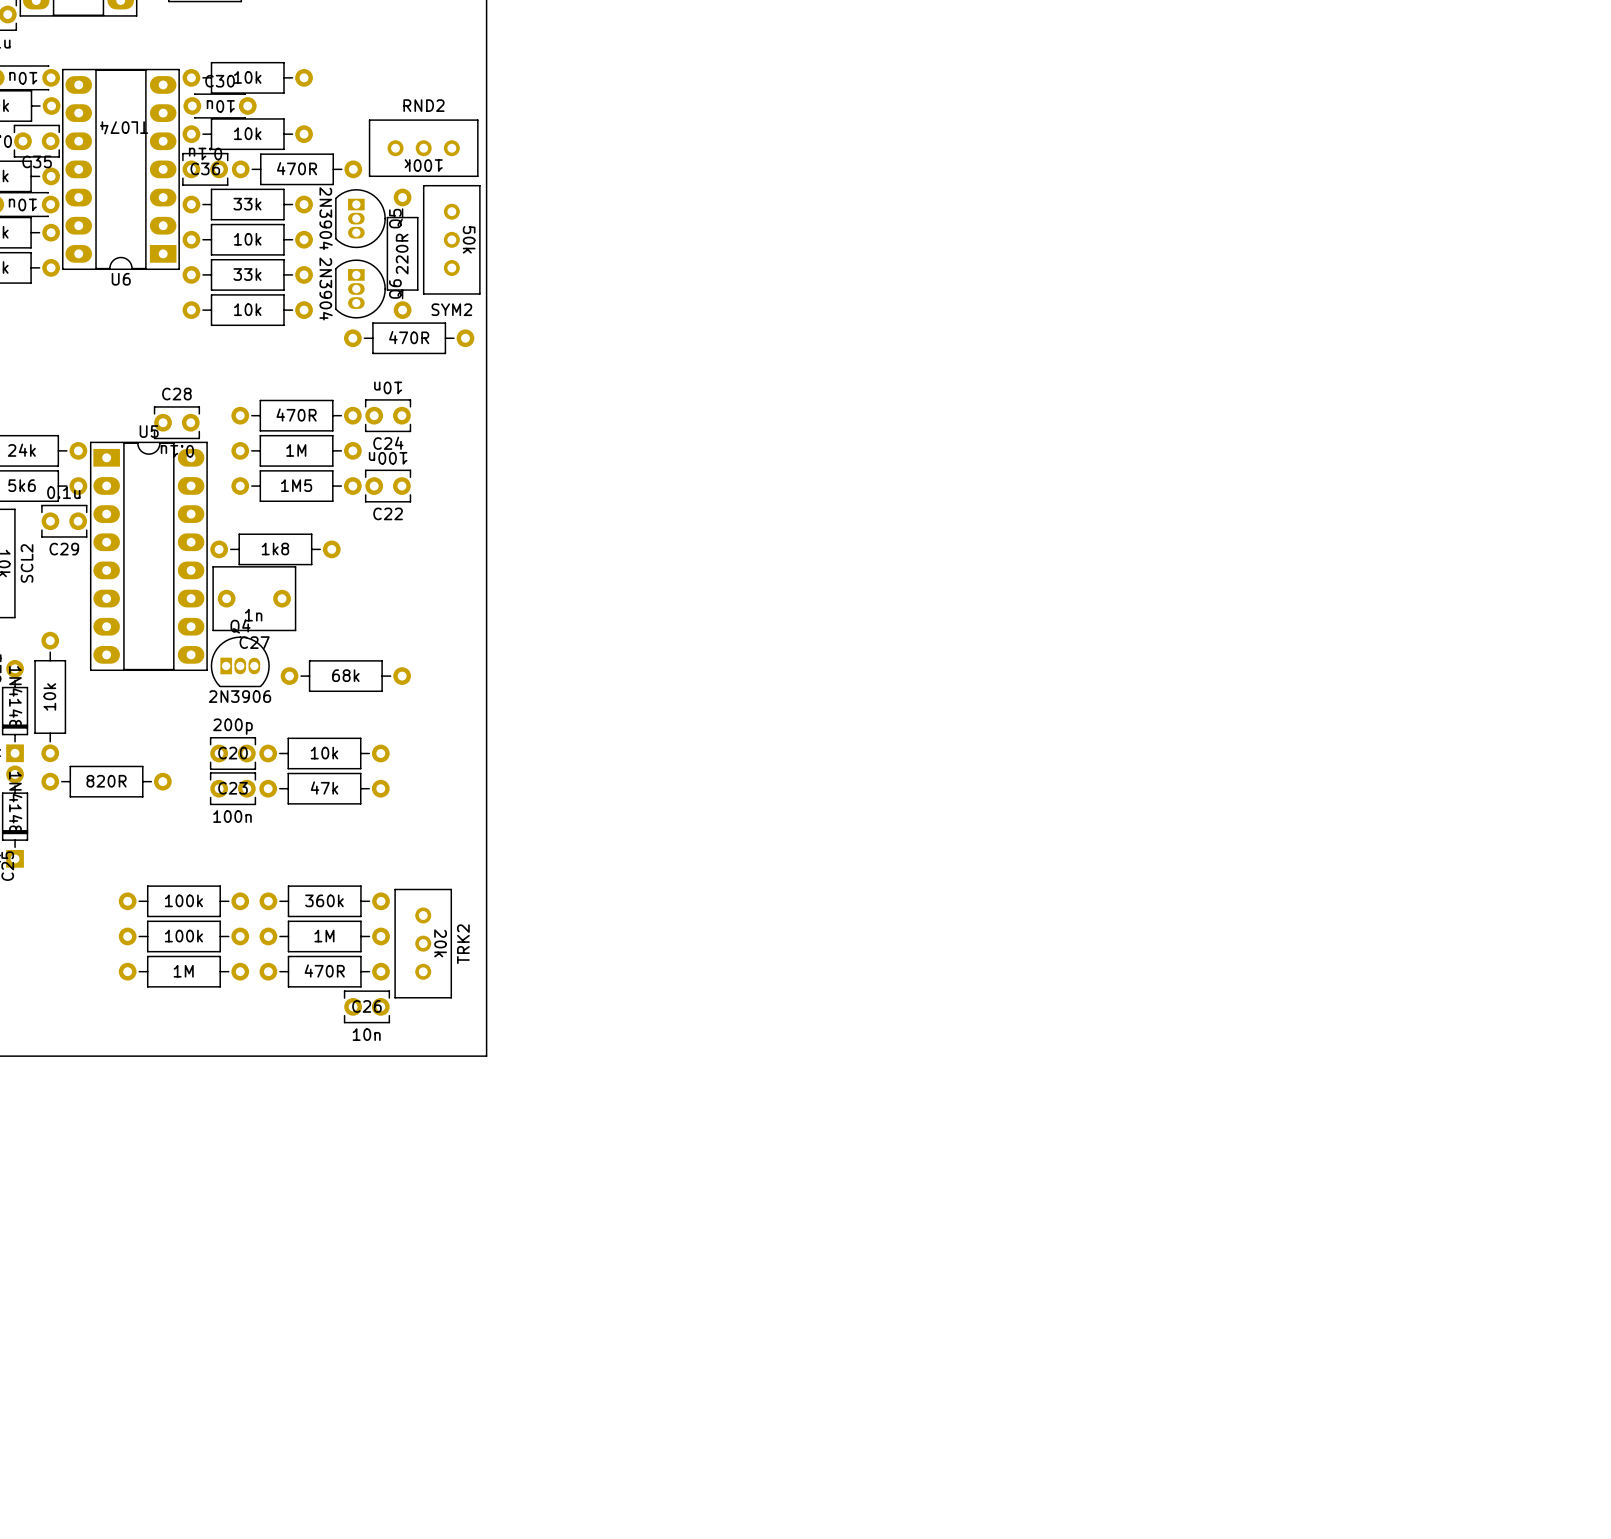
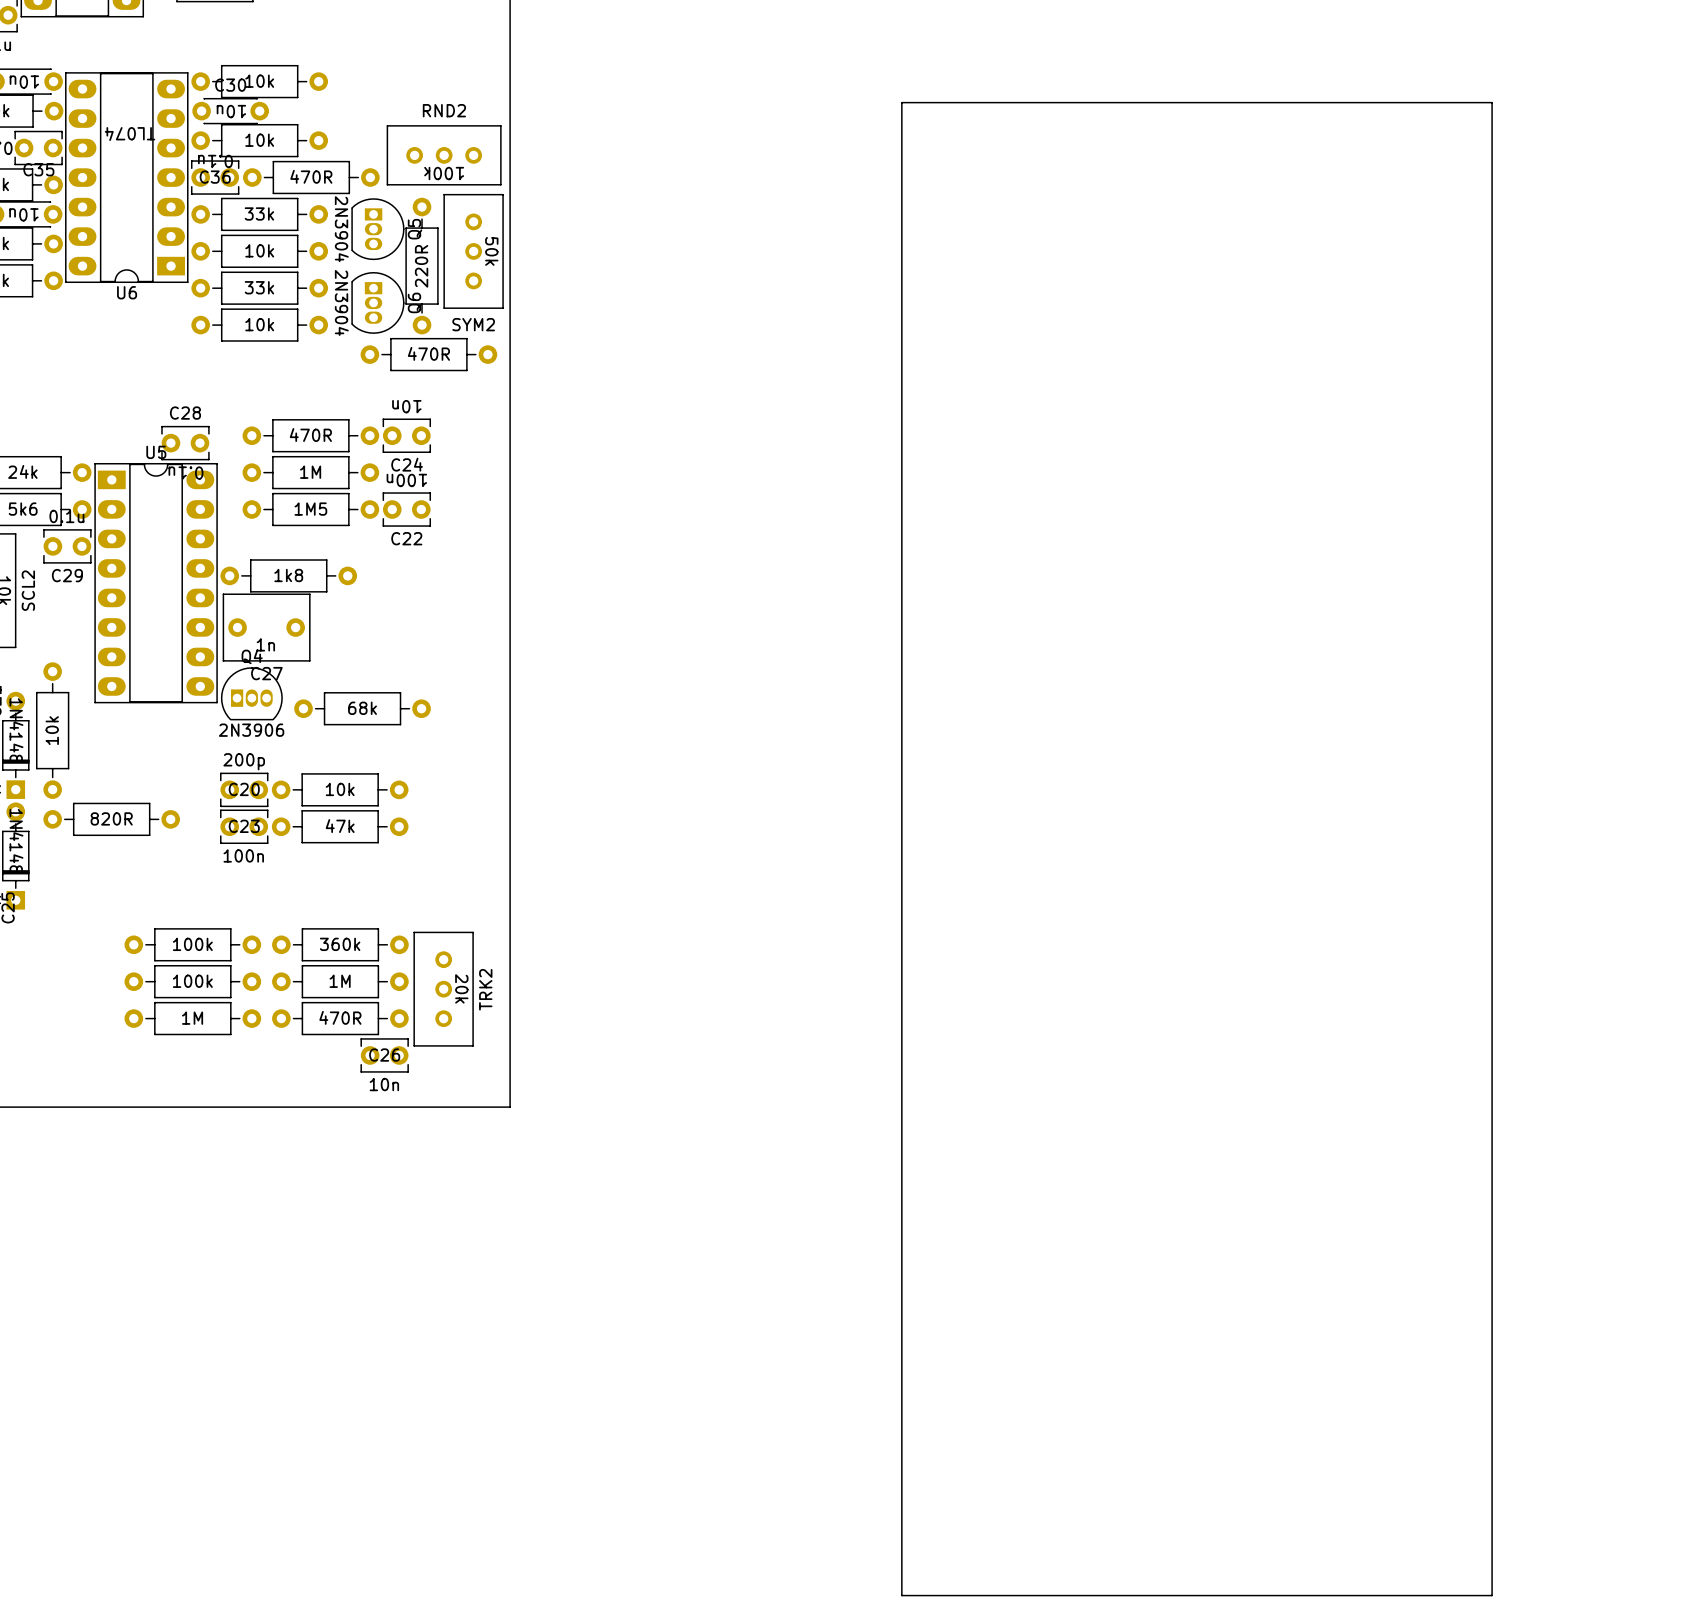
board edge: none -> (901, 102) (1492, 102) (1492, 1595) (901, 1595) (901, 102)

